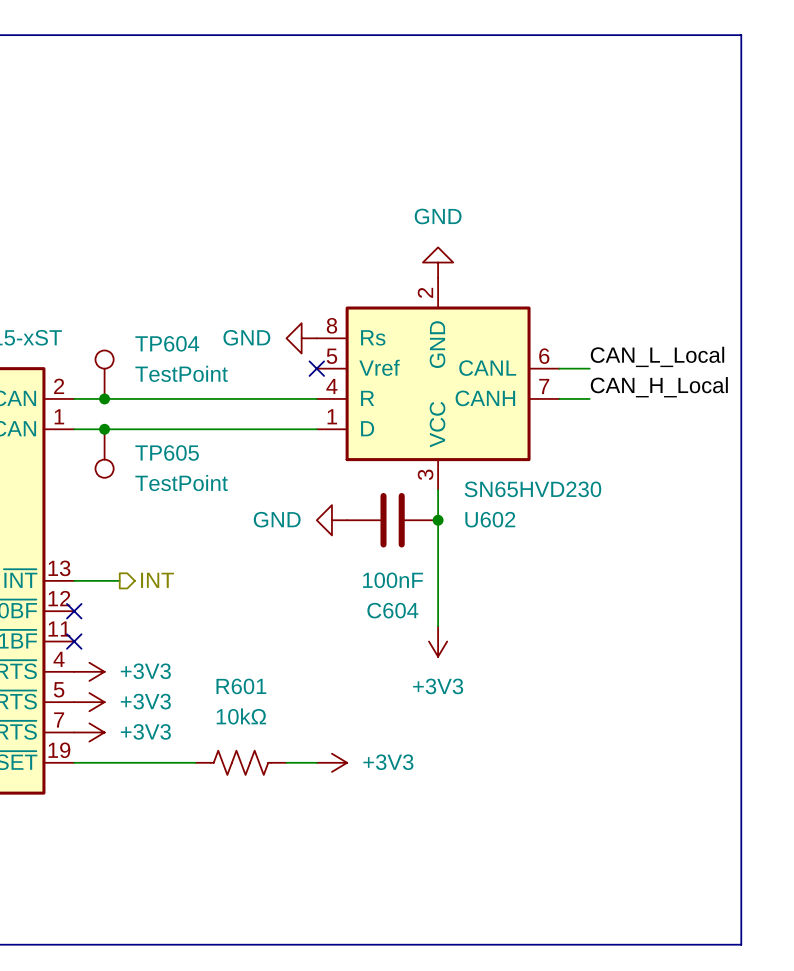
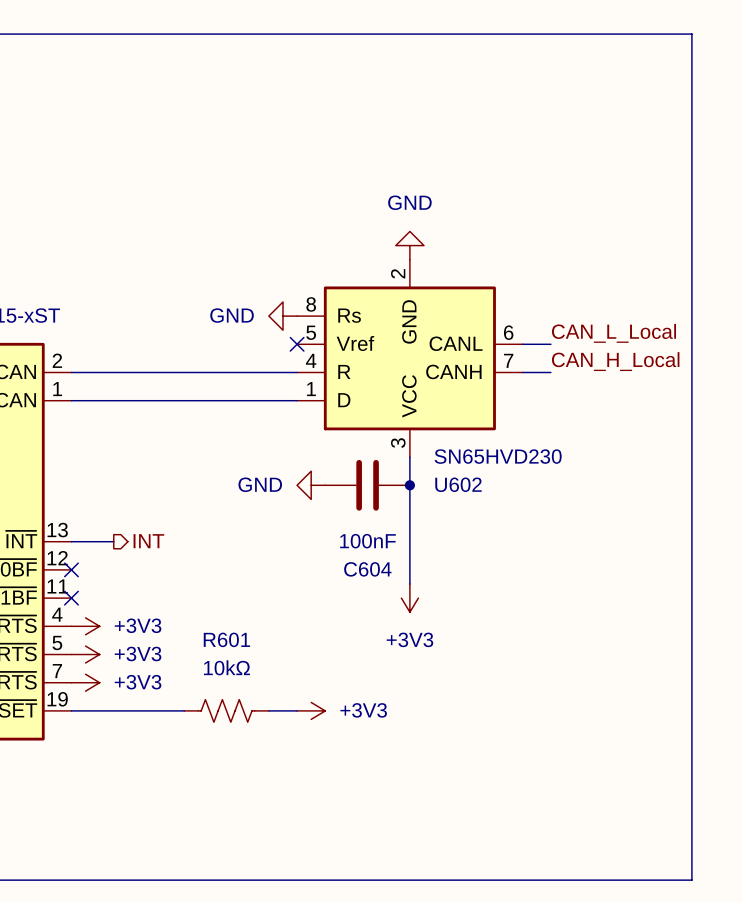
TP604: TestPoint (104, 374) -> none
junction: (104, 398) -> none
junction: (104, 429) -> none
TP605: TestPoint (104, 453) -> none

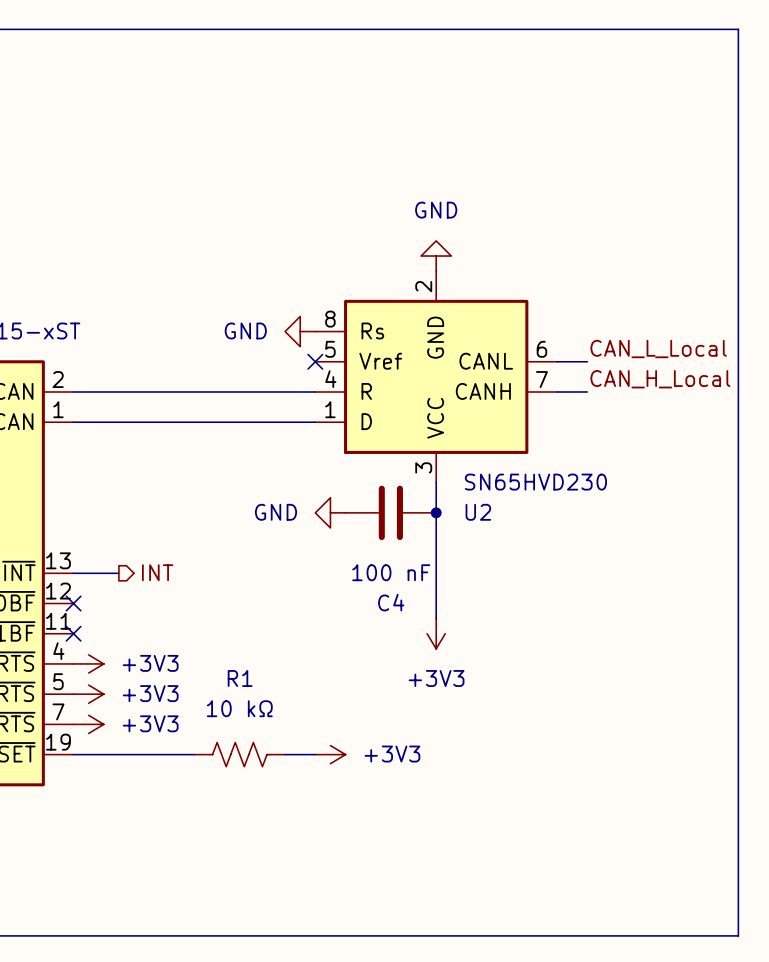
U602 name: U602 (458, 484) -> U2 (478, 512)
C604 value: 100nF (367, 541) -> 100 nF (391, 572)
C604 name: C604 (367, 569) -> C4 (391, 602)
R601 name: R601 (226, 639) -> R1 (240, 678)
R601 value: 10kΩ (226, 667) -> 10 kΩ (239, 708)

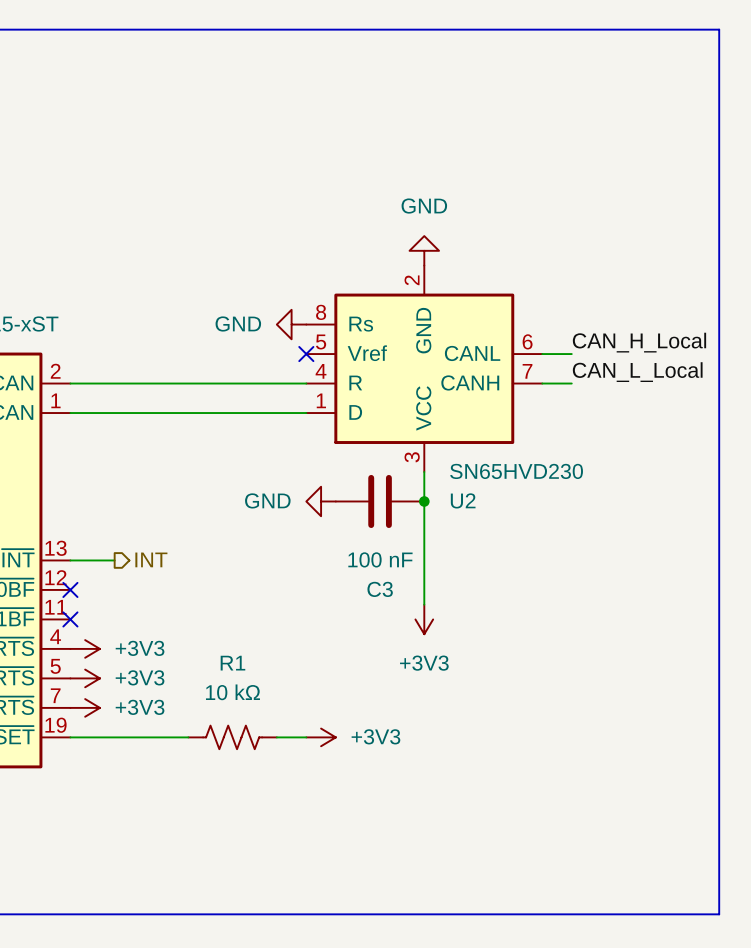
label: CAN_L_Local (658, 349) -> CAN_H_Local (639, 342)
label: CAN_H_Local (660, 379) -> CAN_L_Local (637, 372)
C4 name: C4 (391, 602) -> C3 (380, 589)

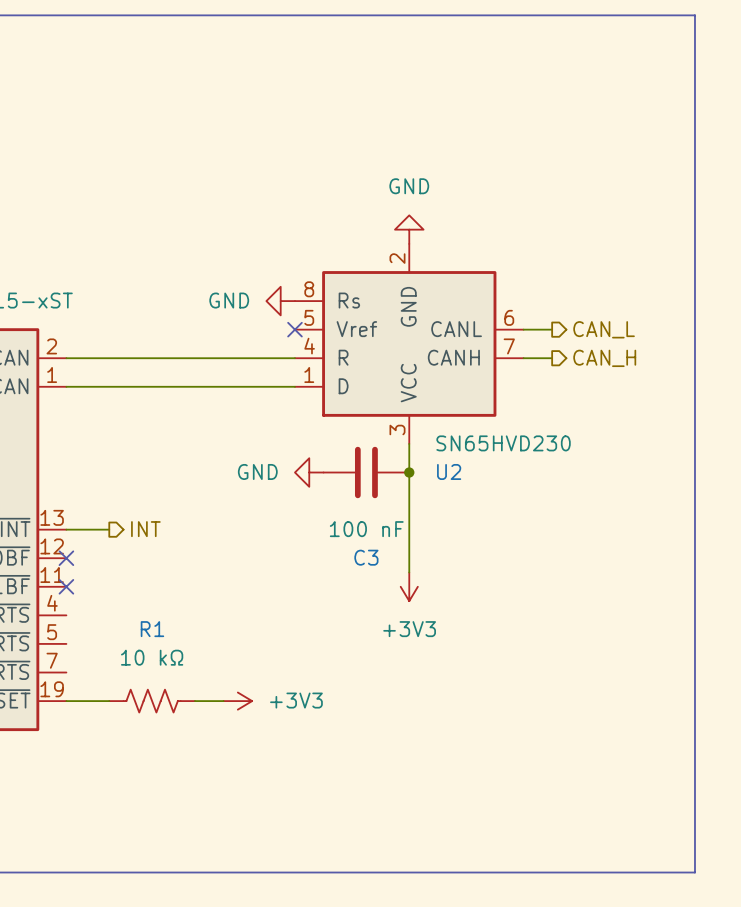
label: CAN_H_Local (639, 342) -> none
hierarchical label: none -> CAN_L (604, 329)
label: CAN_L_Local (637, 372) -> none
hierarchical label: none -> CAN_H (604, 358)
power symbol: +3V3 (85, 648) -> none
power symbol: +3V3 (85, 678) -> none
power symbol: +3V3 (85, 707) -> none
wire: (114, 737) (188, 737) -> none
R1 position: (232, 737) -> (152, 701)
wire: (276, 737) (306, 737) -> (194, 701) (223, 701)
power symbol position: +3V3 (321, 737) -> +3V3 (237, 701)

